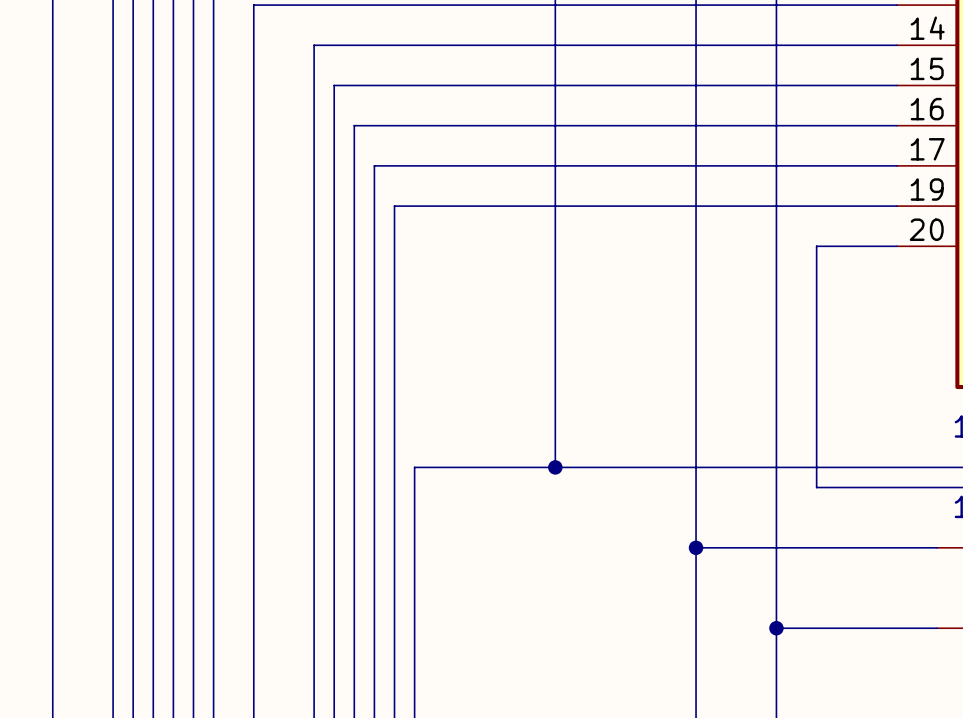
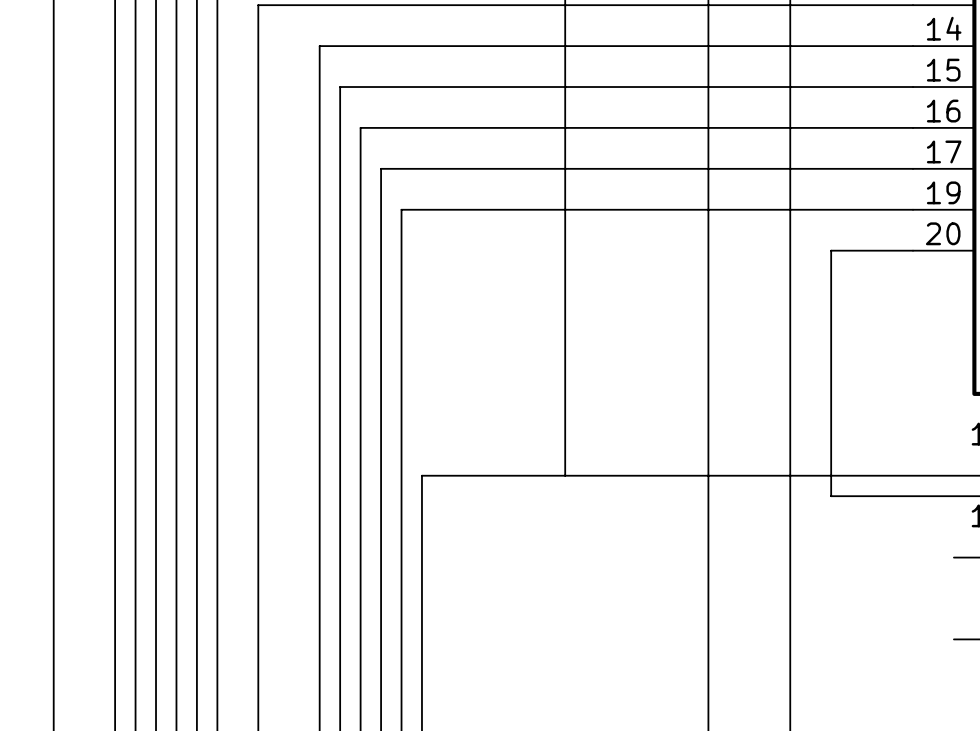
junction: (555, 467) -> none
wire: (696, 547) (937, 547) -> none
junction: (696, 547) -> none
wire: (776, 628) (937, 628) -> none
junction: (776, 628) -> none

